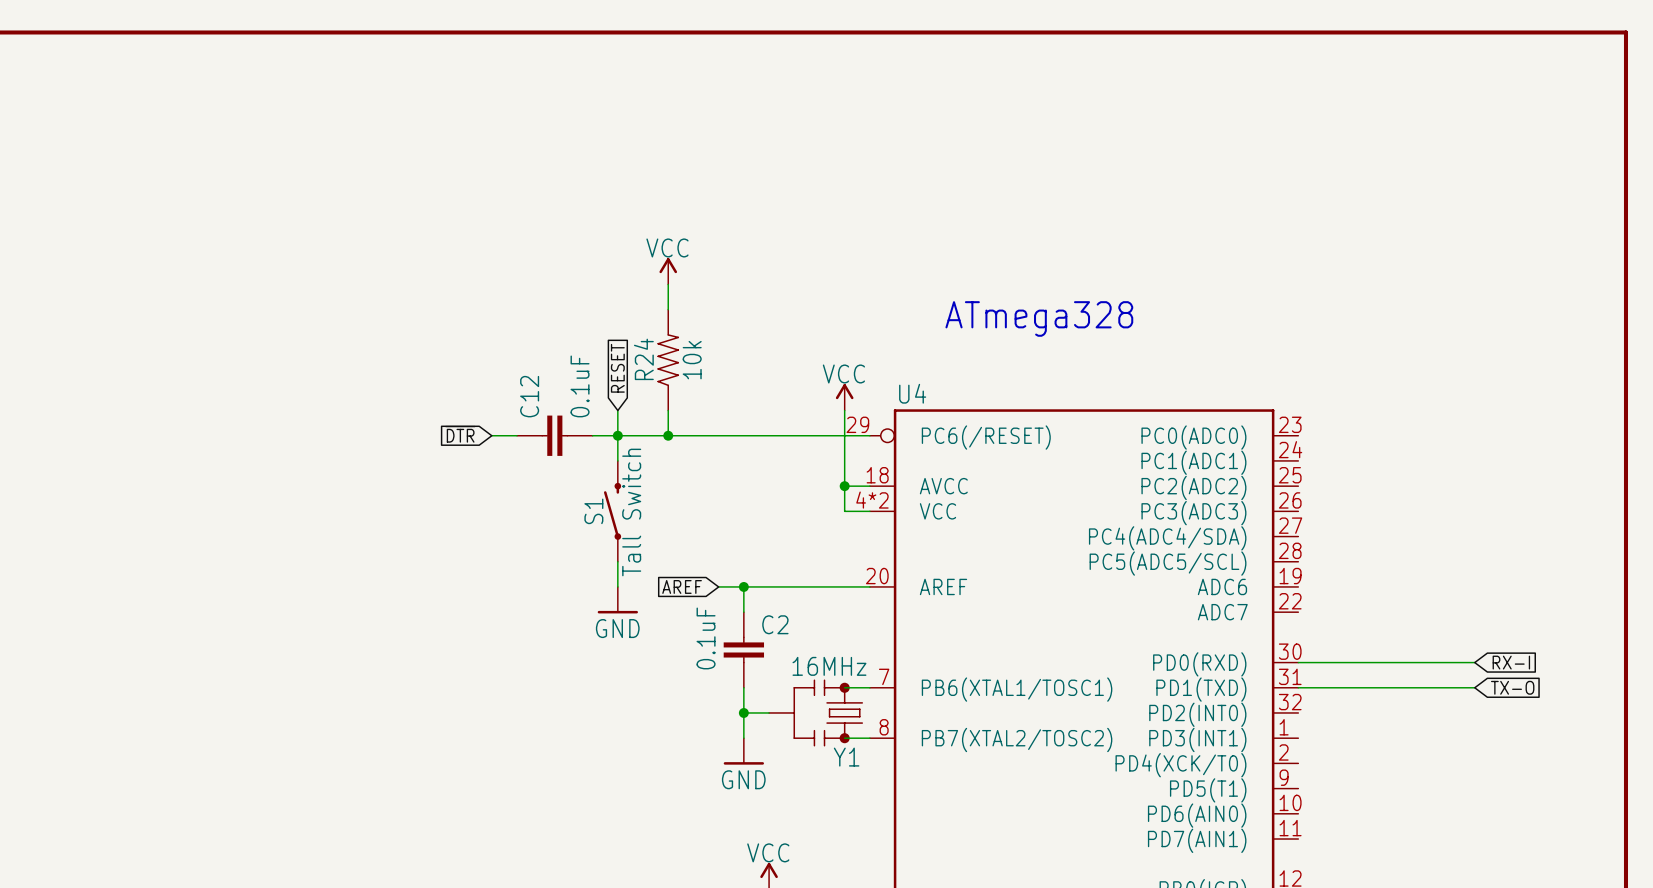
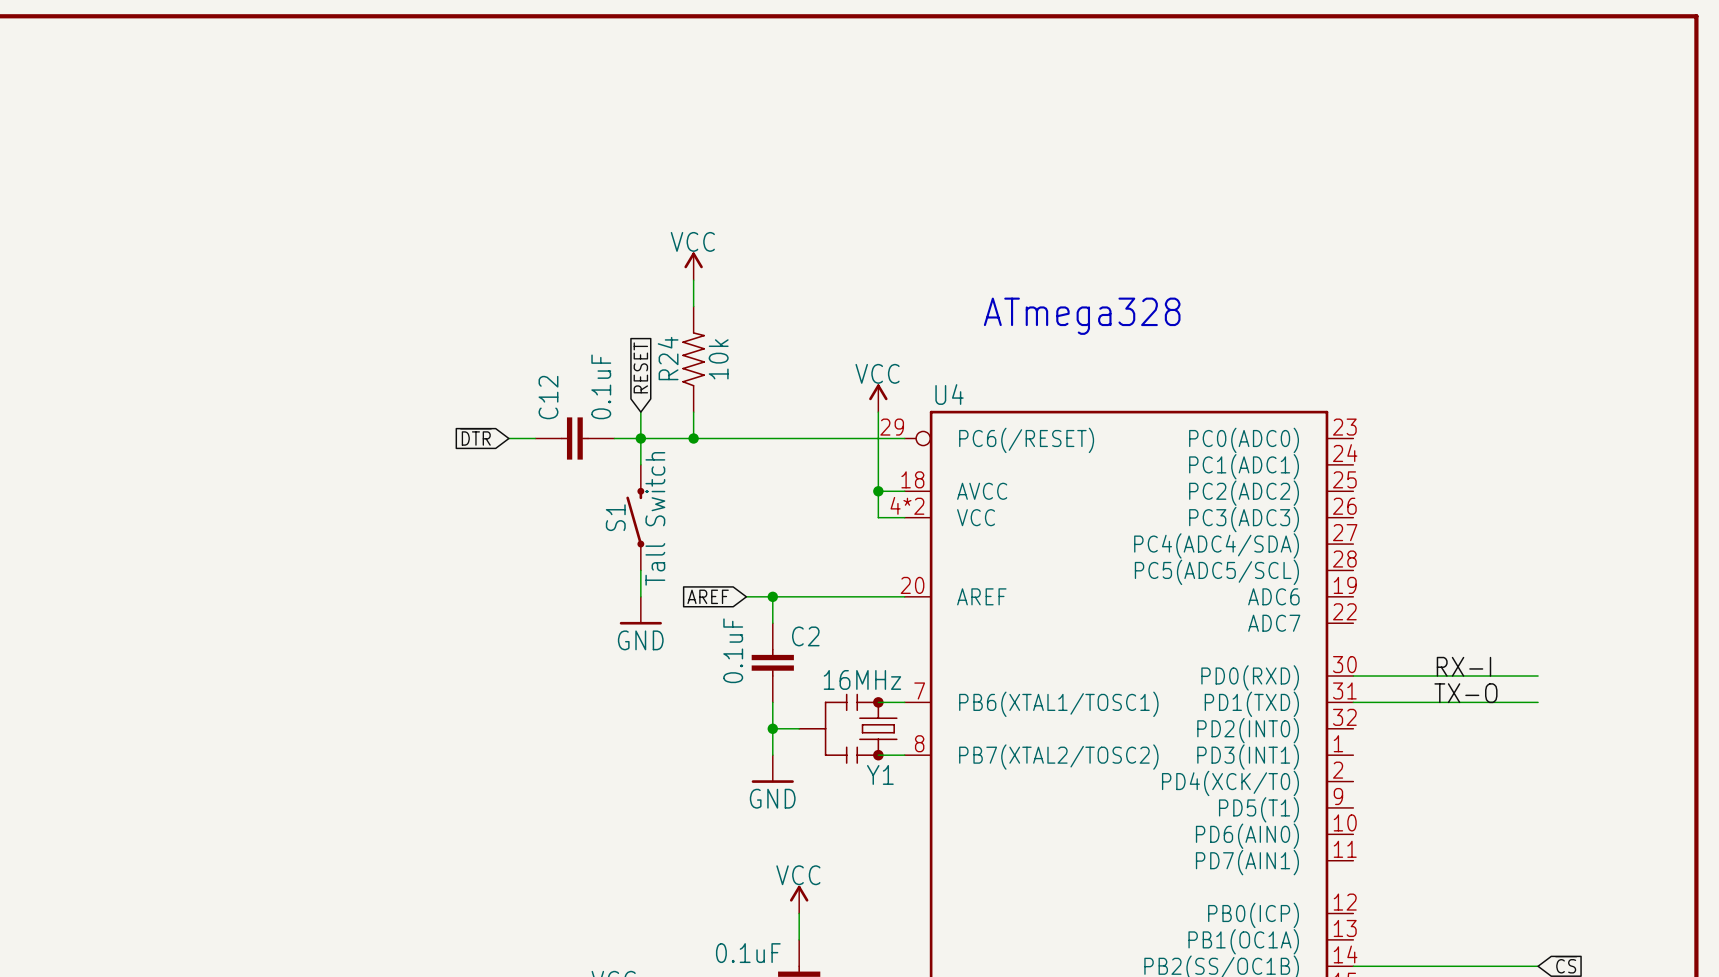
label: none -> RX-I (1463, 666)
global label: RX-I (1511, 662) -> none
label: none -> TX-O (1465, 693)
global label: TX-O (1512, 687) -> none

